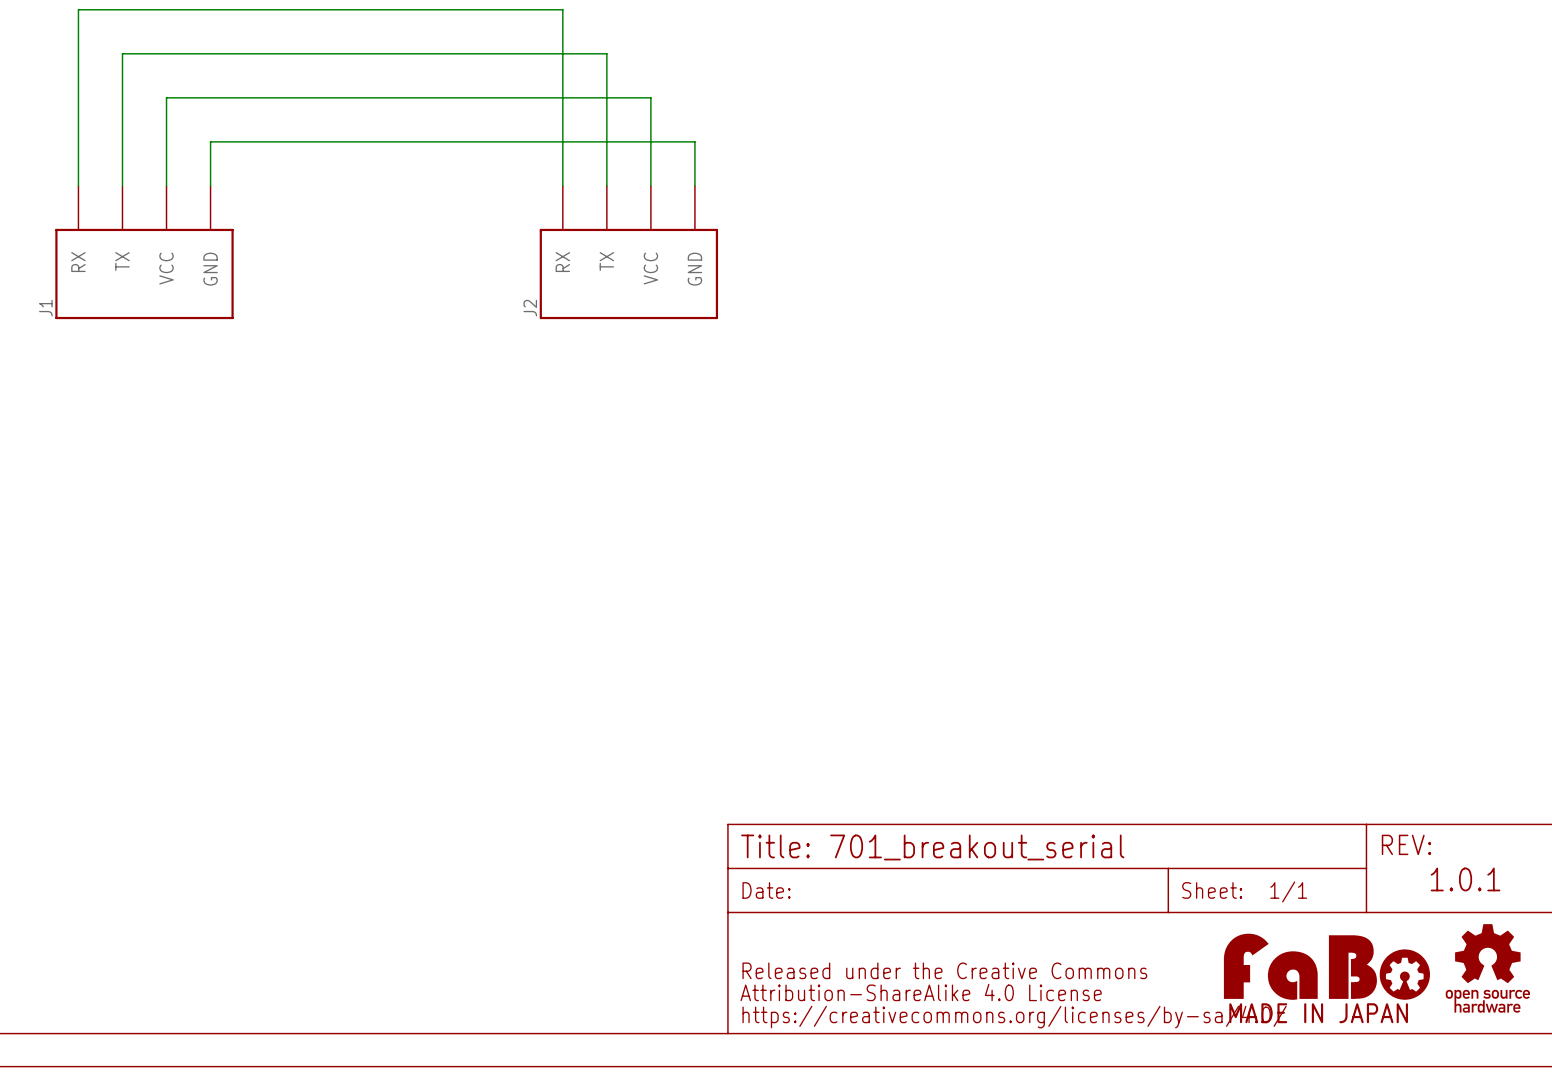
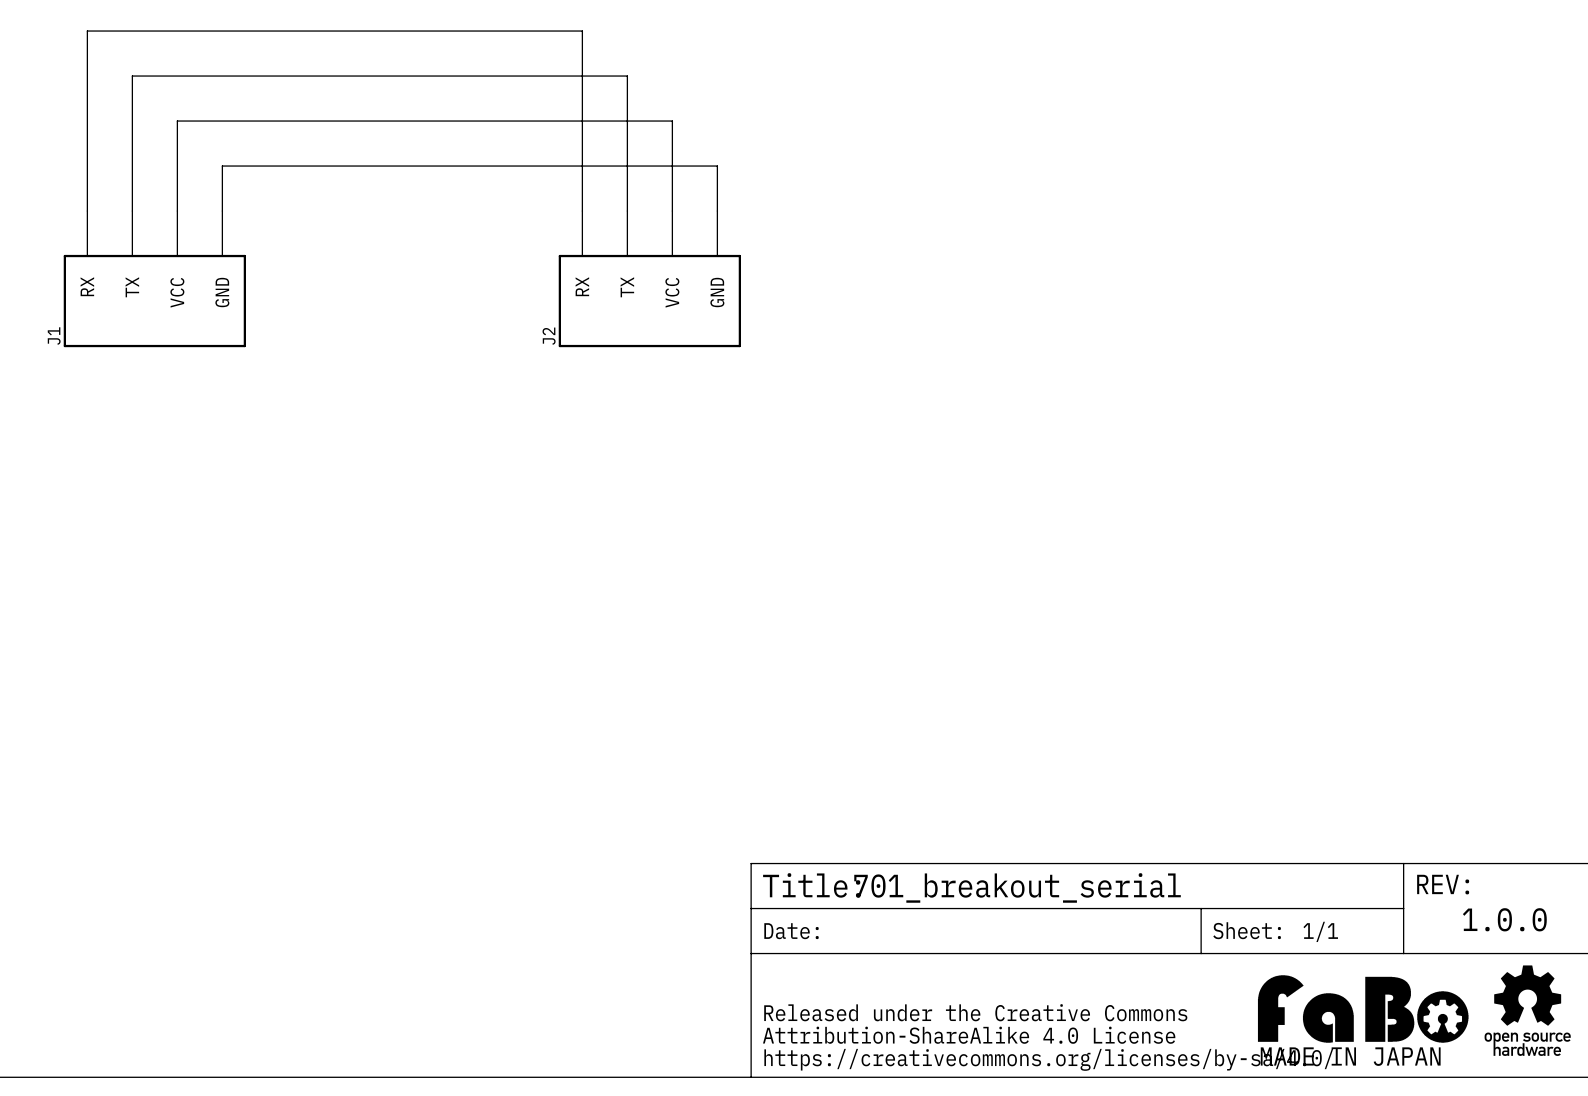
text: 1.0.1 (1465, 879) -> 1.0.0 (1504, 919)

